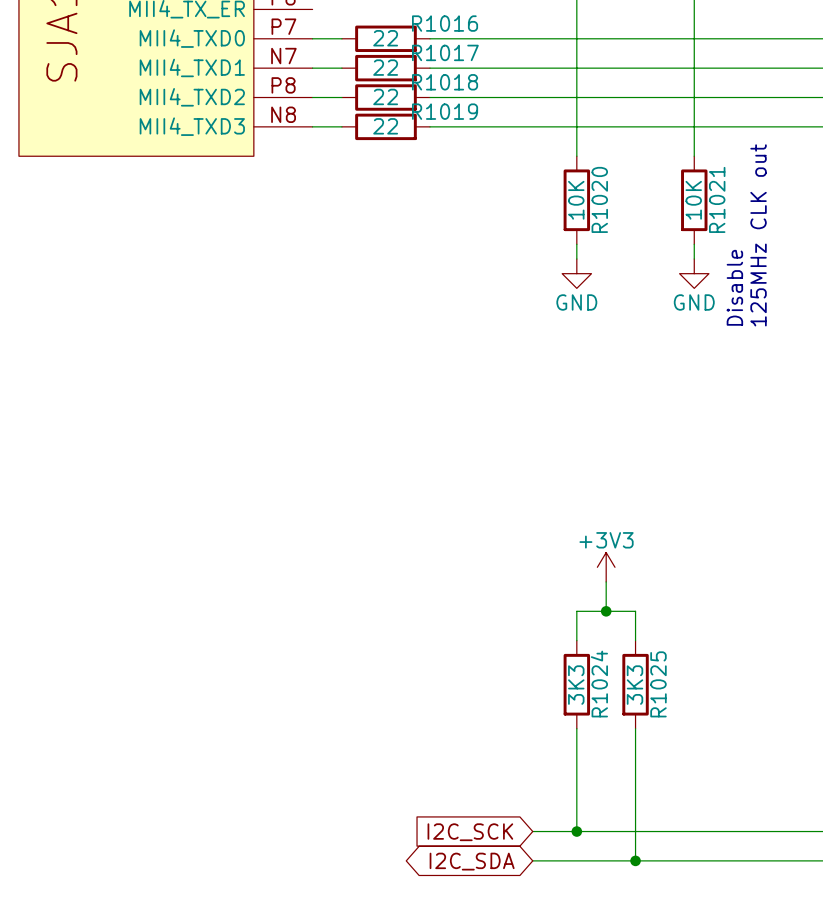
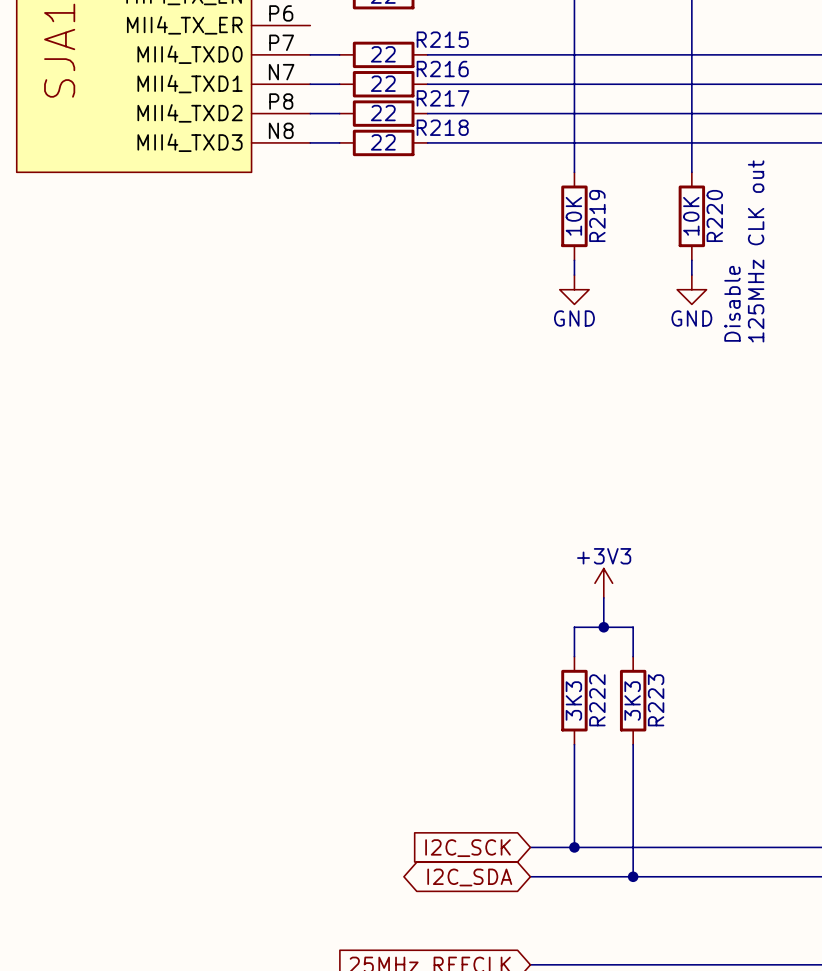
R1016 name: R1016 (445, 23) -> R215 (442, 39)
R1017 name: R1017 (445, 52) -> R216 (442, 69)
R1018 name: R1018 (445, 82) -> R217 (443, 98)
R1019 name: R1019 (445, 111) -> R218 (442, 127)
R1020 name: R1020 (599, 199) -> R219 (597, 215)
R1021 name: R1021 (717, 199) -> R220 (714, 215)
R1024 name: R1024 (599, 684) -> R222 (597, 700)
R1025 name: R1025 (658, 684) -> R223 (656, 700)

